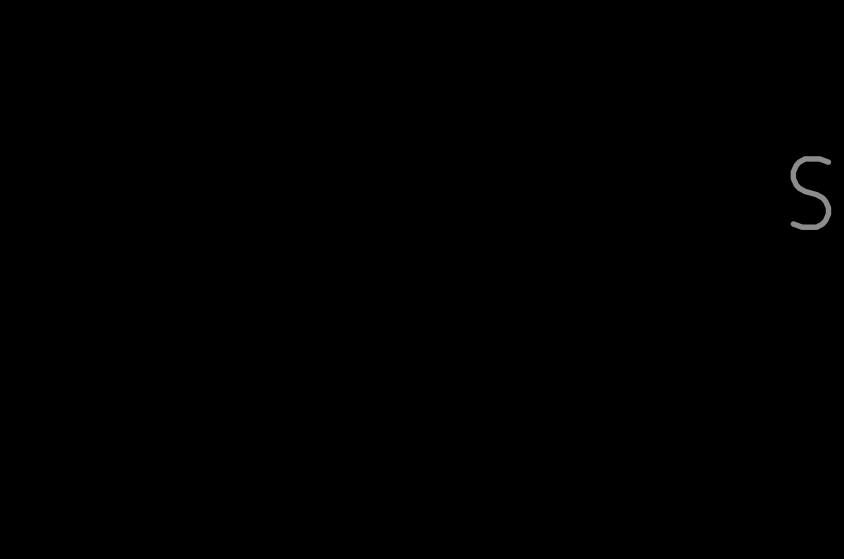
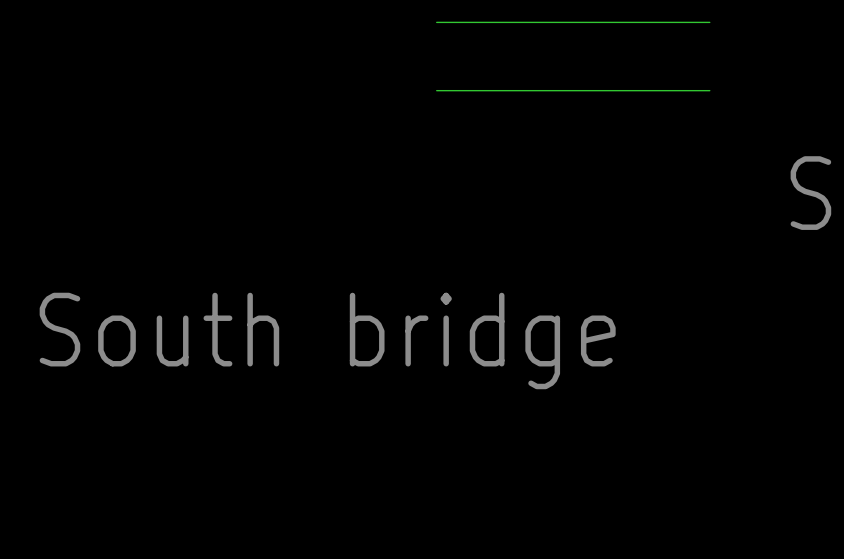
wire: none -> (436, 22) (709, 22)
wire: none -> (436, 90) (709, 90)
text: none -> South bridge (327, 340)

